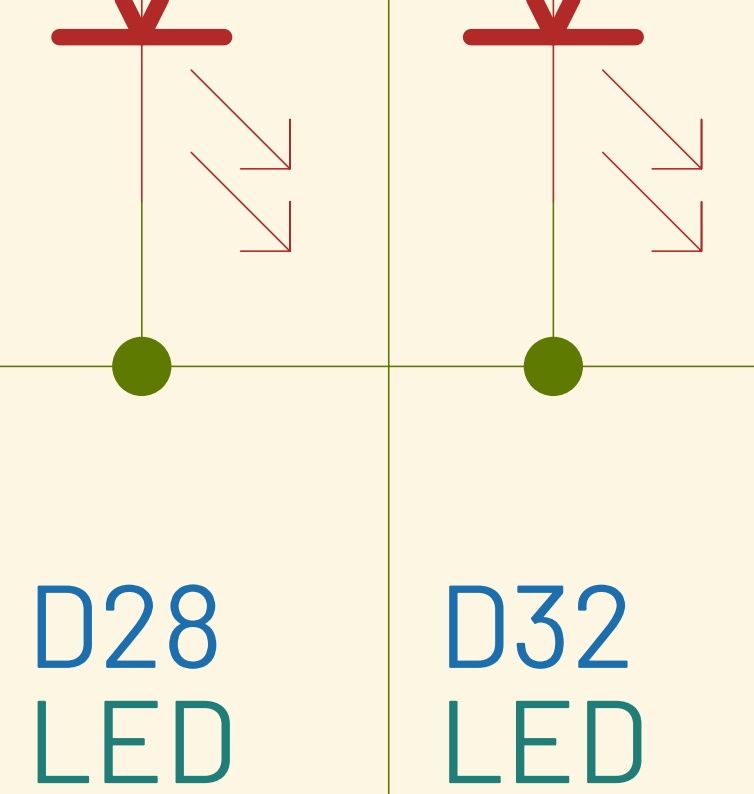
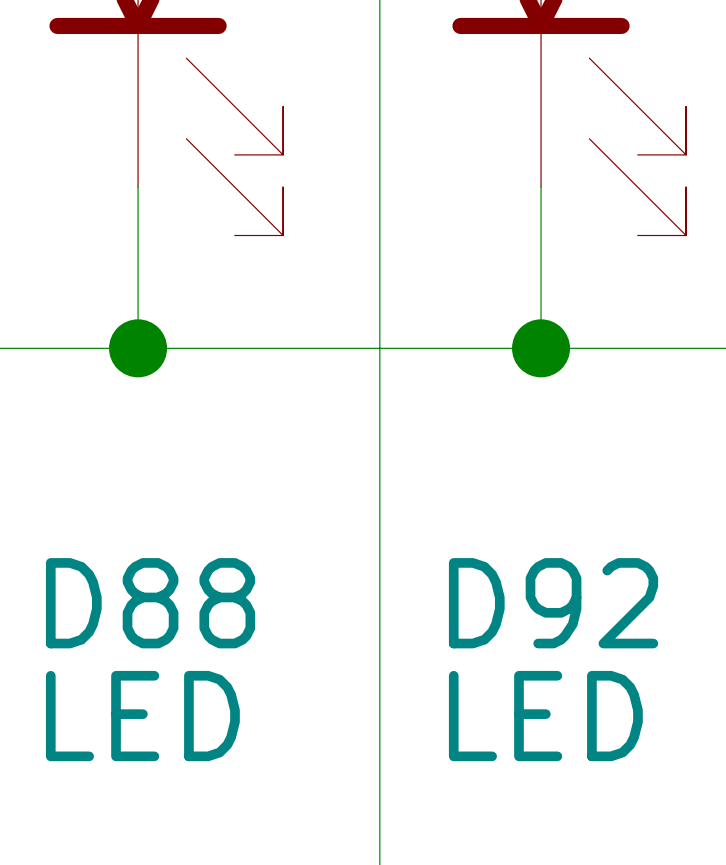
D28 name: D28 (126, 626) -> D88 (150, 603)
D32 name: D32 (538, 626) -> D92 (553, 603)

